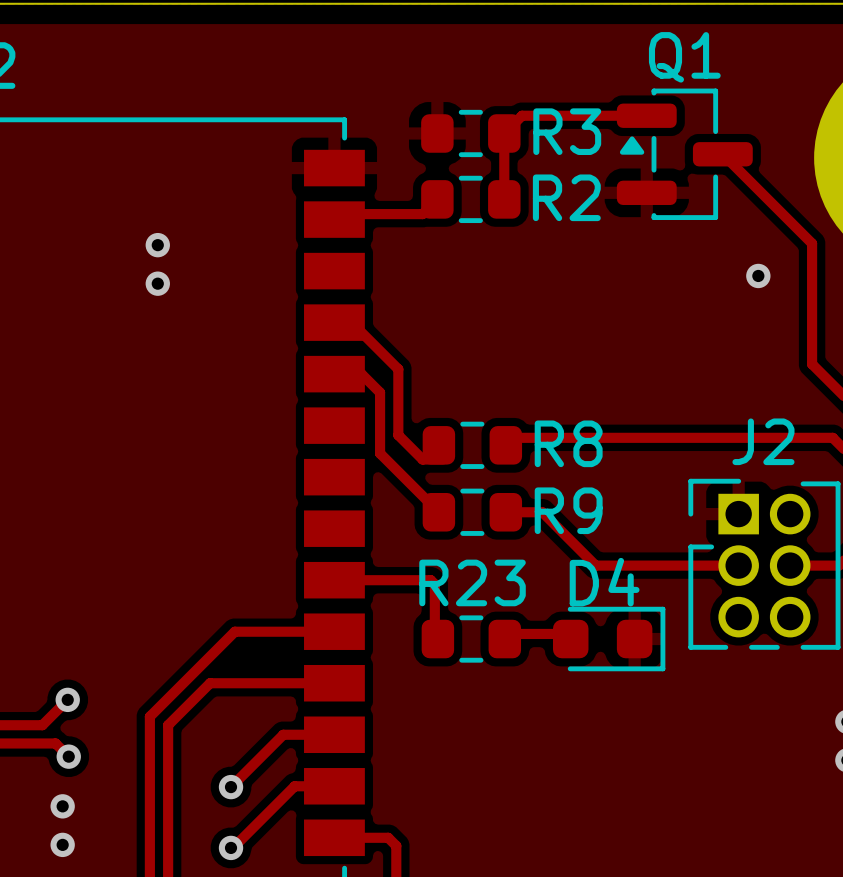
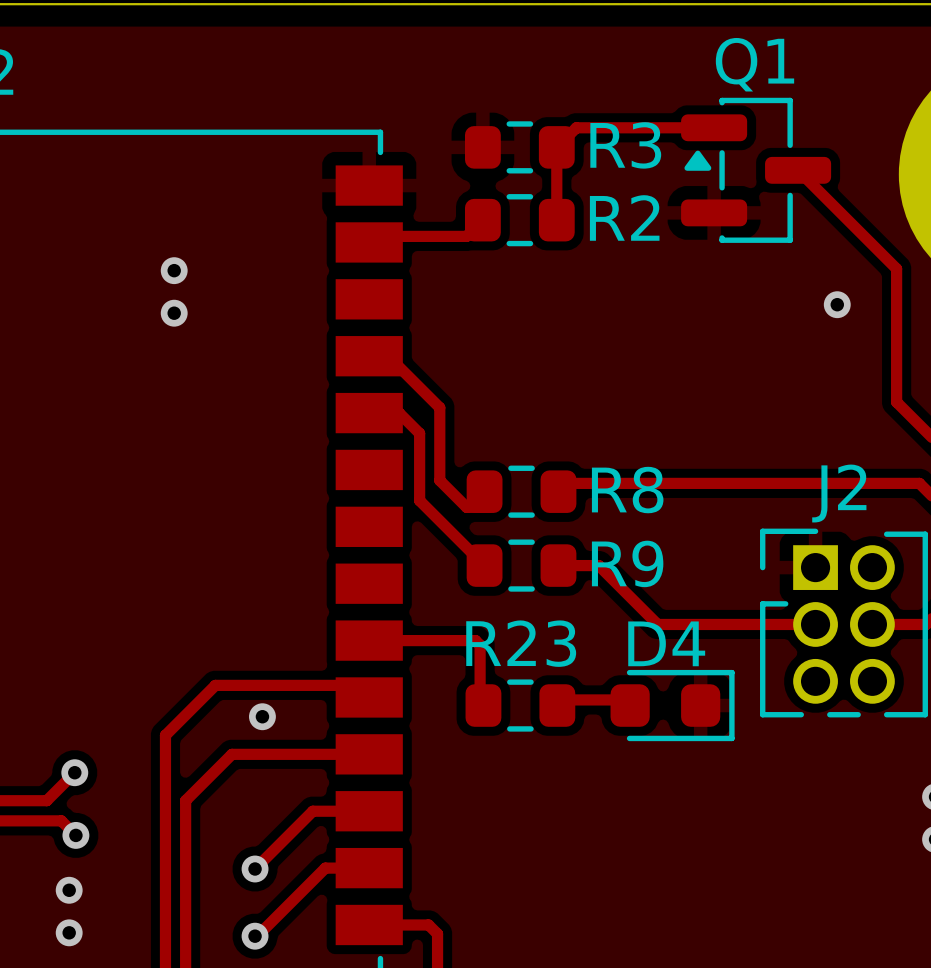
track: (334, 631) (234, 631) (149, 716) -> (369, 697) (357, 685) (215, 685) (165, 735) (165, 791)
via: none -> (262, 716)

